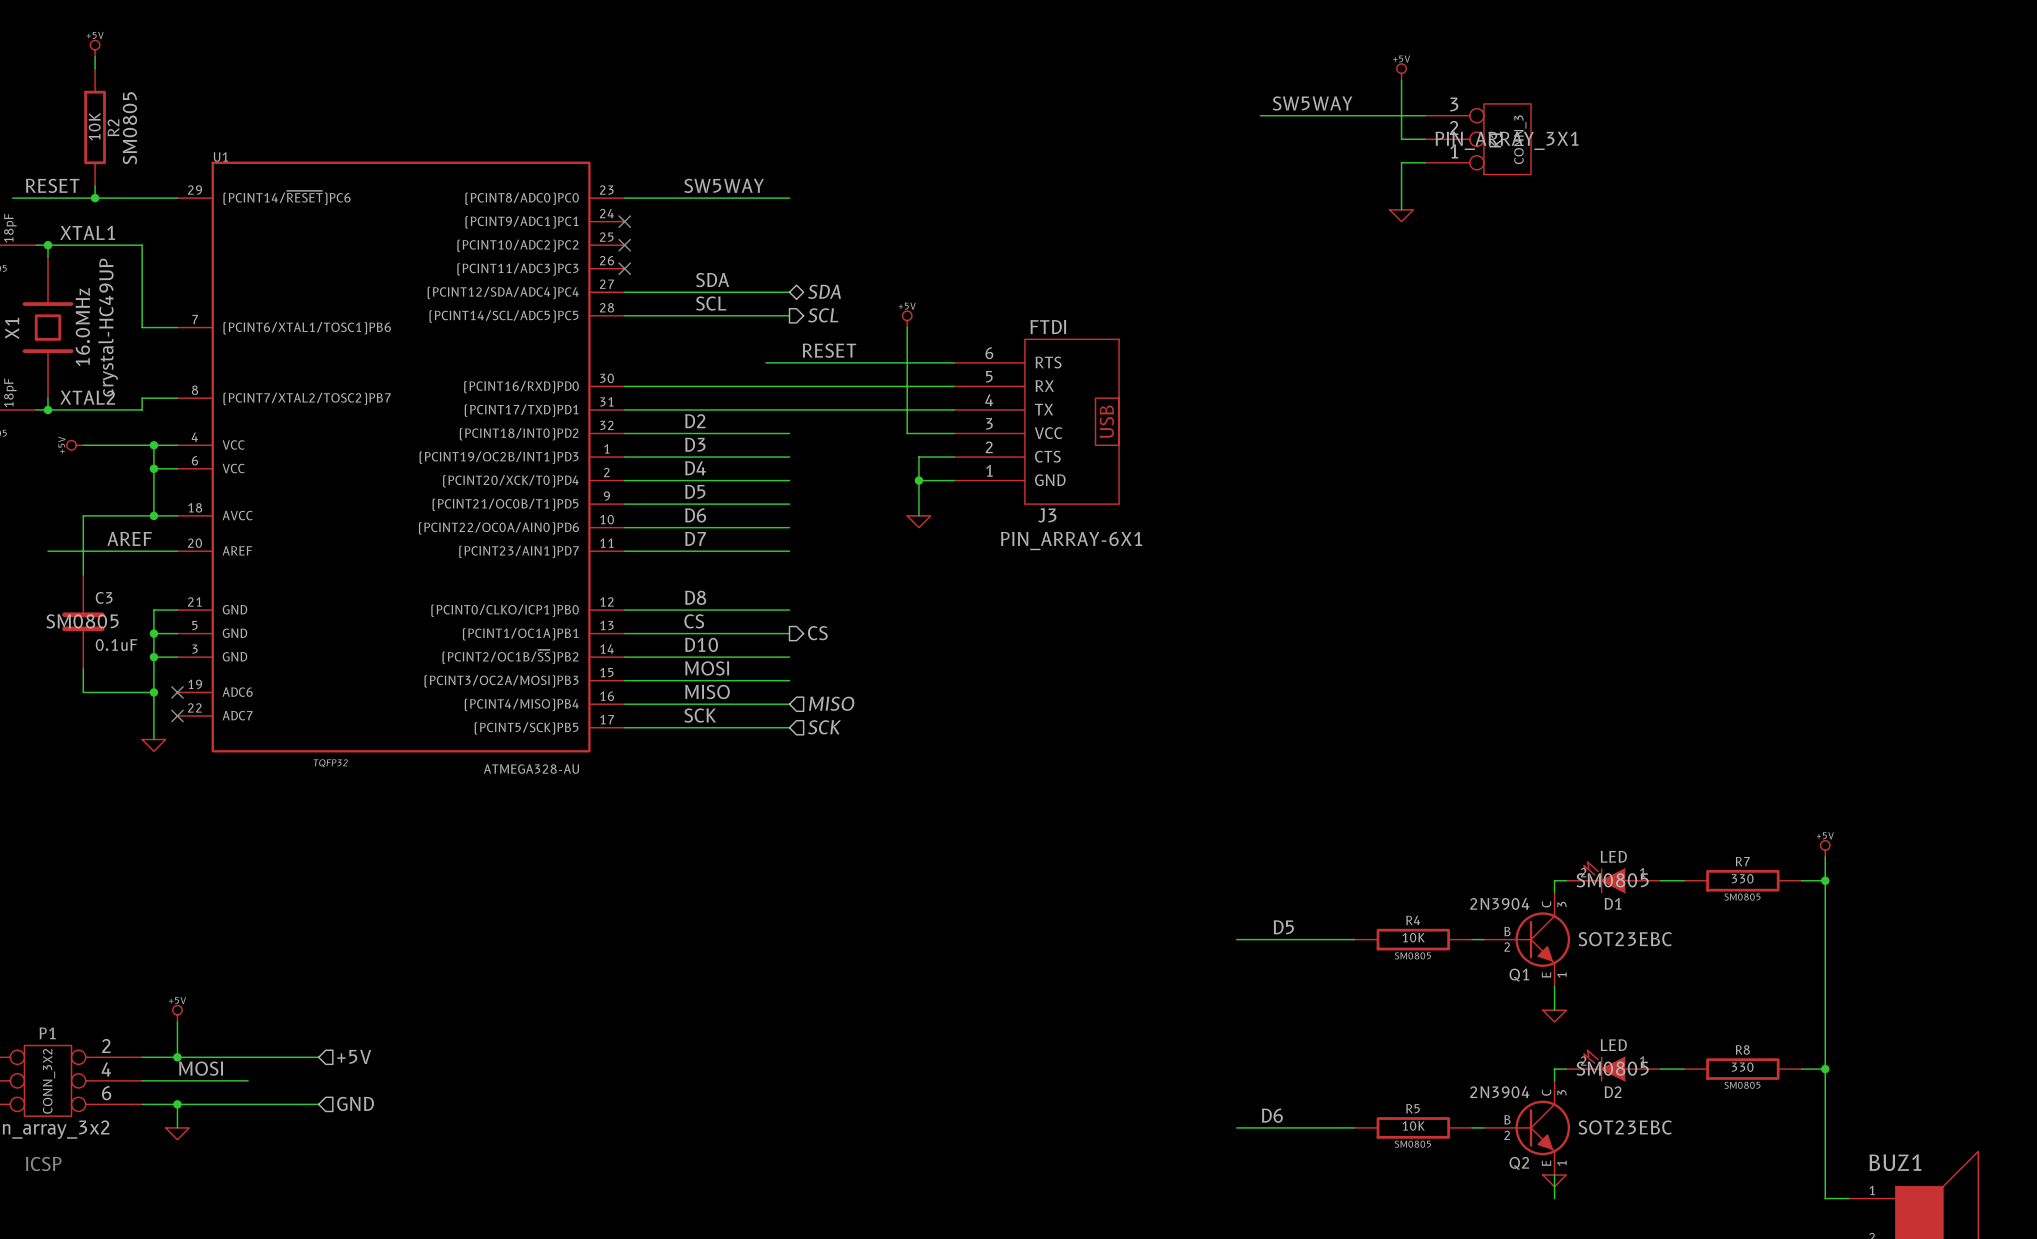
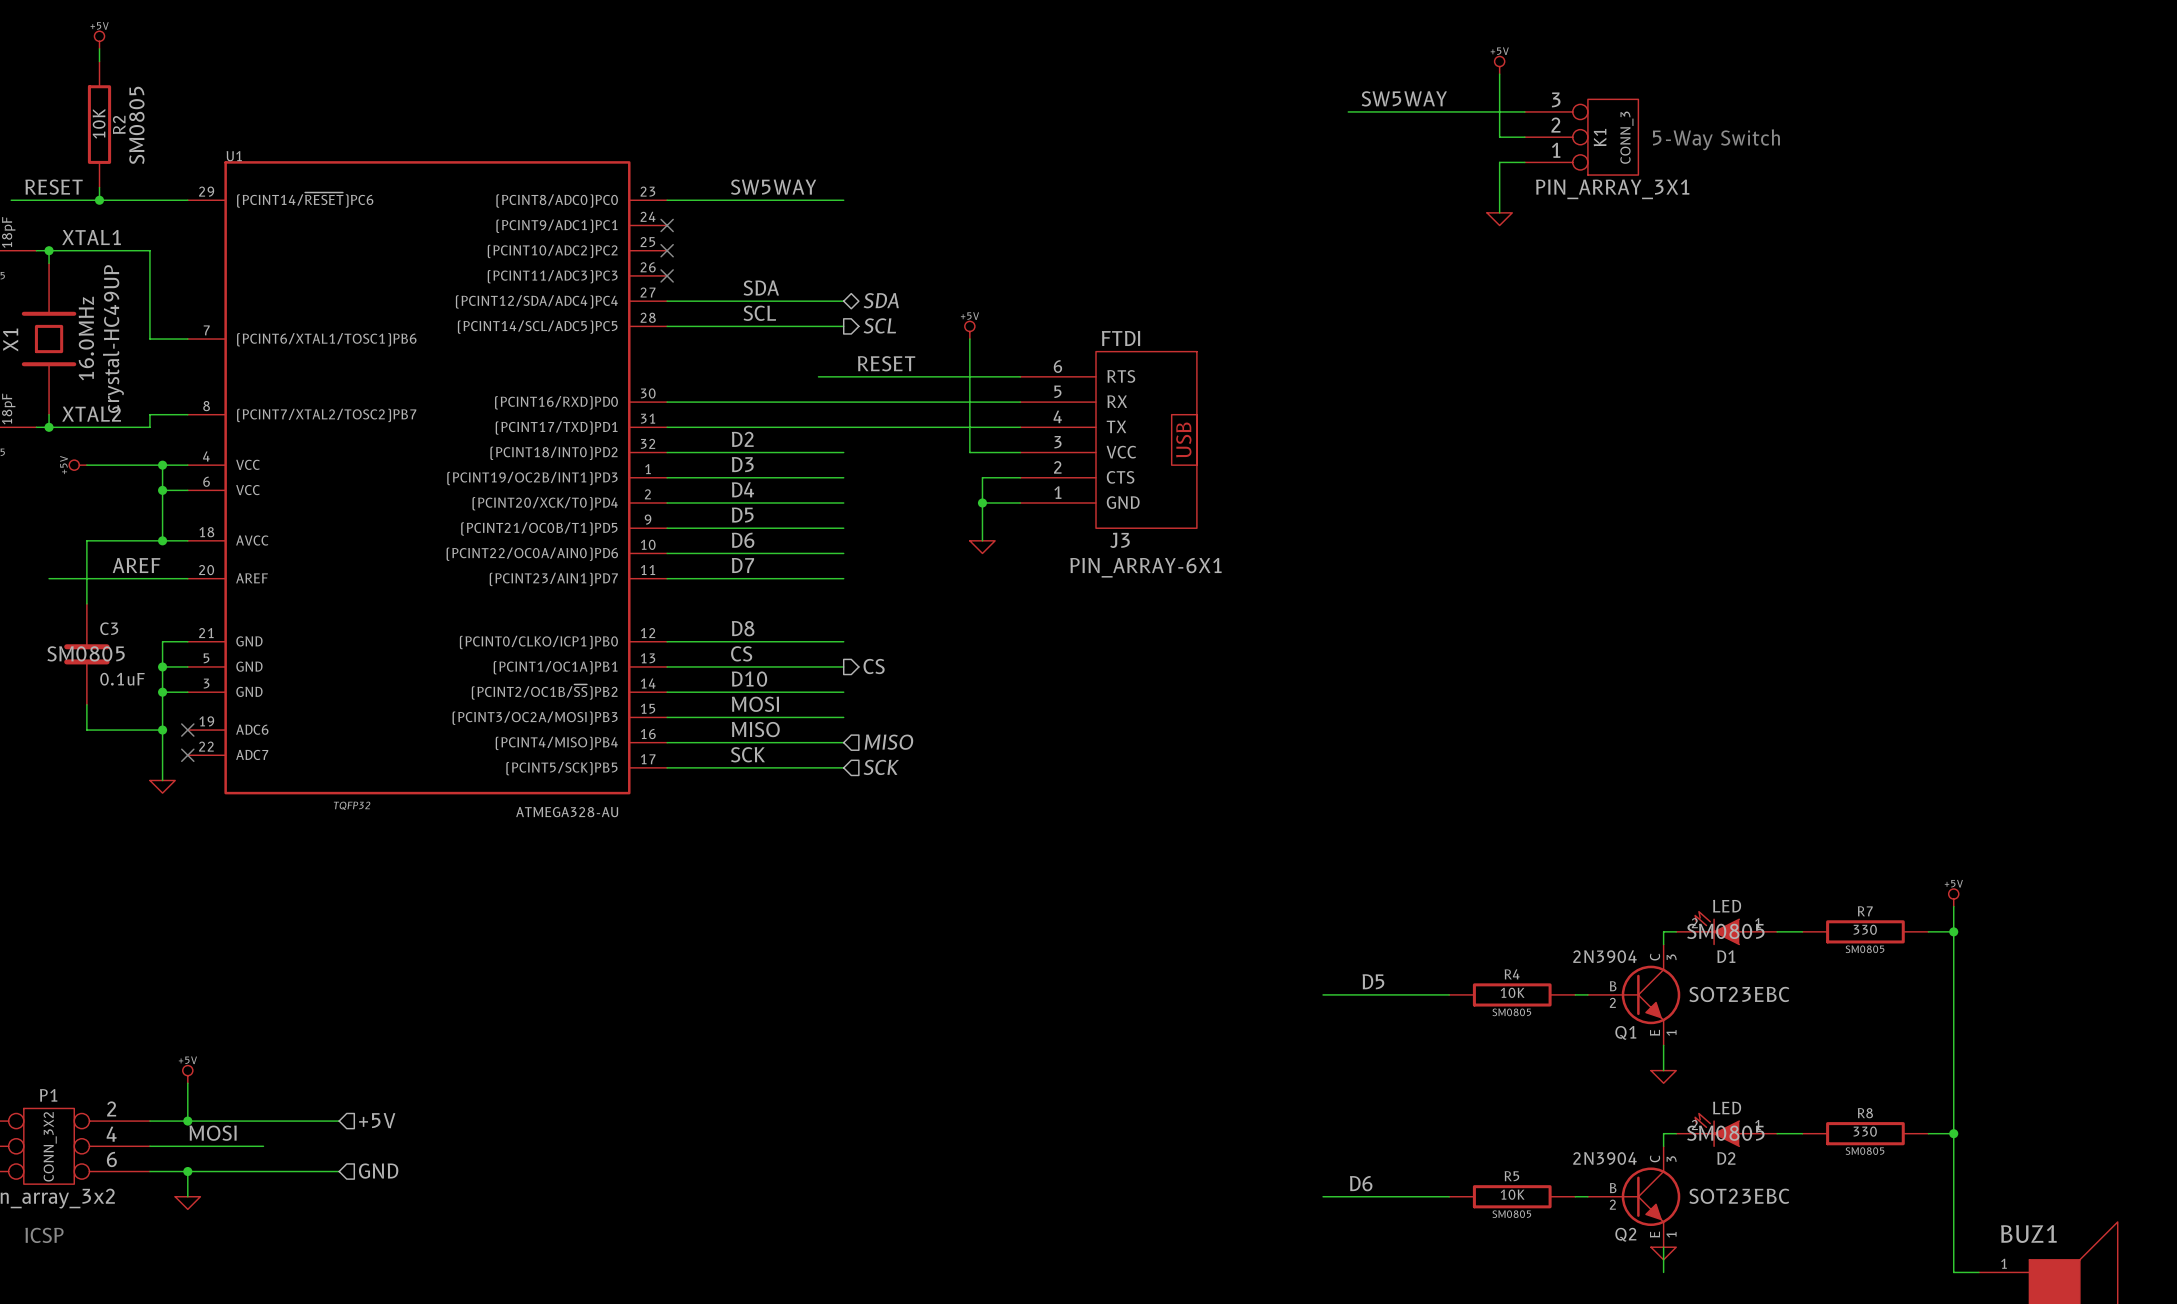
K1 text position: PIN_ARRAY_3X1 (1507, 140) -> PIN_ARRAY_3X1 (1612, 189)
text: none -> 5-Way Switch (1716, 139)

